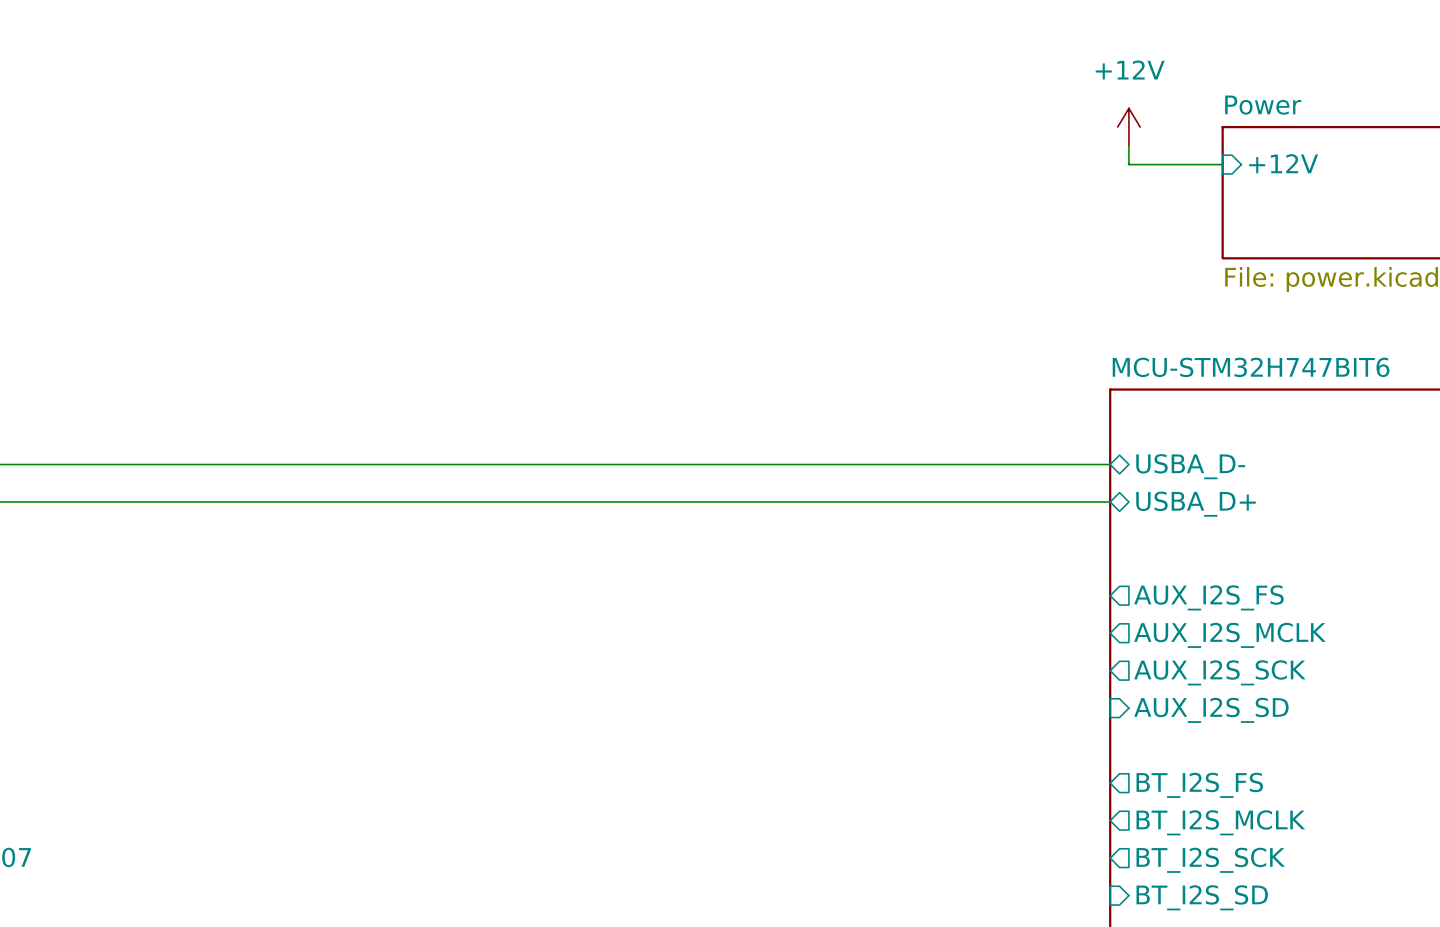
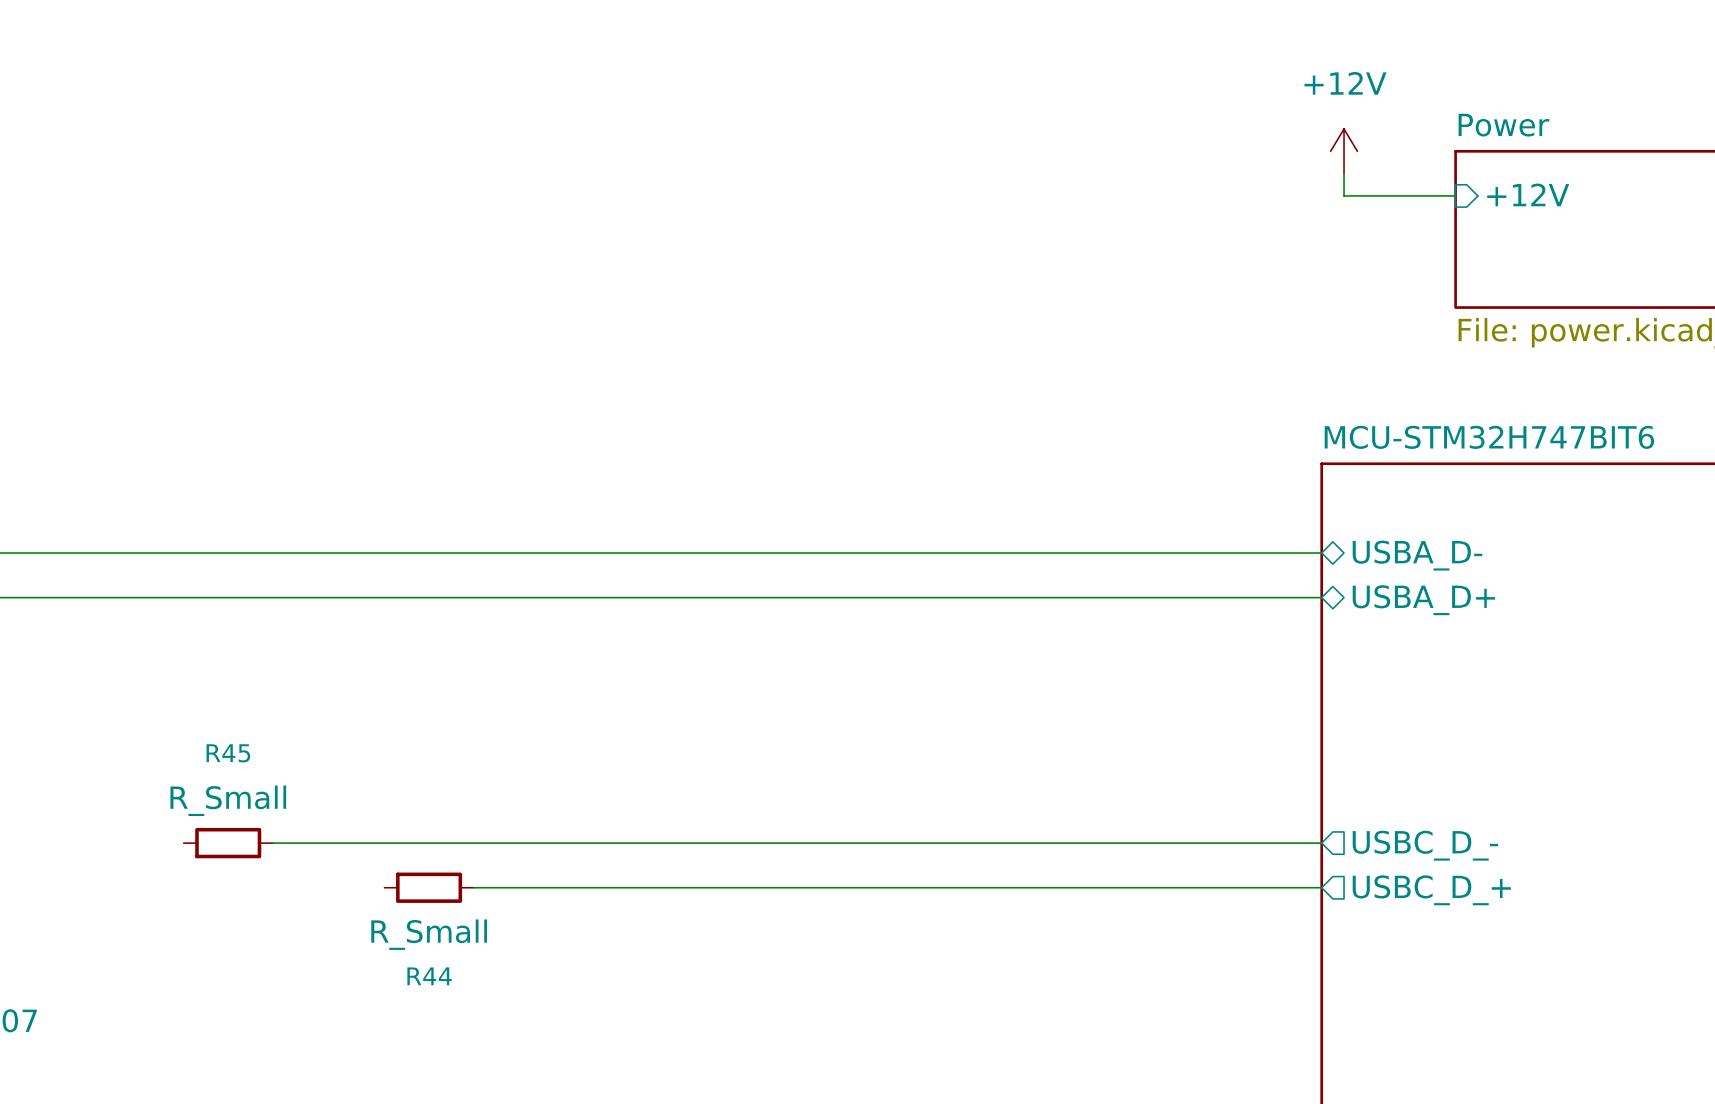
sheet pin: AUX_I2S_FS (1208, 597) -> none
sheet pin: AUX_I2S_MCLK (1230, 635) -> none
sheet pin: AUX_I2S_SCK (1219, 672) -> none
R45: none -> R_Small (228, 843)
wire: none -> (272, 843) (1321, 843)
sheet pin shape: input (1211, 710) -> output (1425, 845)
sheet pin: AUX_I2S_SD (1211, 710) -> USBC_D_- (1425, 845)
R44: none -> R_Small (429, 887)
wire: none -> (473, 887) (1321, 887)
sheet pin: none -> USBC_D_+ (1431, 890)
sheet pin: BT_I2S_FS (1199, 785) -> none
sheet pin: BT_I2S_MCLK (1220, 822) -> none
sheet pin: BT_I2S_SCK (1210, 860) -> none
sheet pin: BT_I2S_SD (1202, 897) -> none

